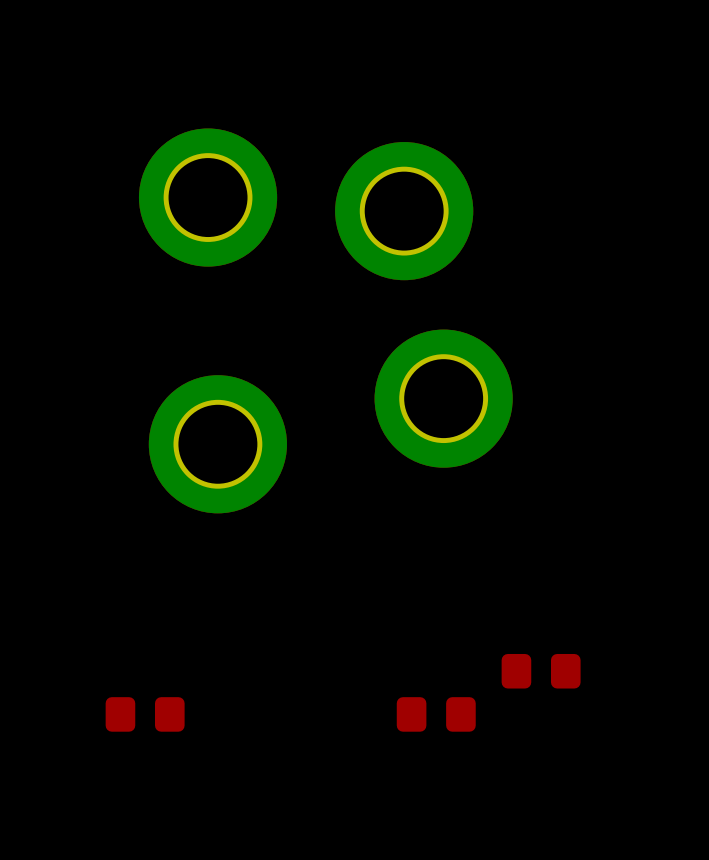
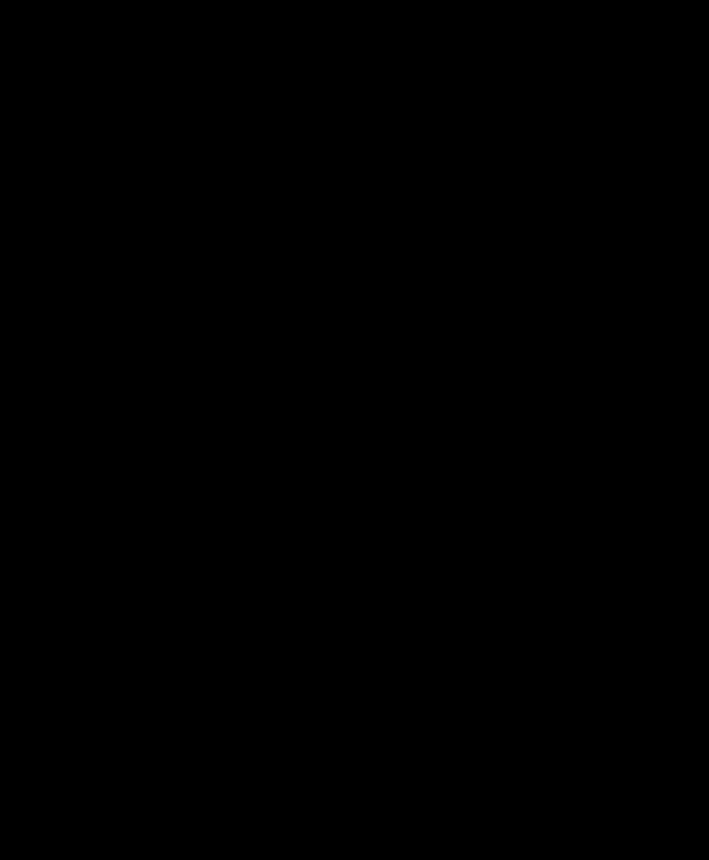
part: (208, 197) -> none
part: (404, 211) -> none
part: (443, 398) -> none
part: (217, 444) -> none
part: (541, 671) -> none
part: (145, 714) -> none
part: (436, 714) -> none

